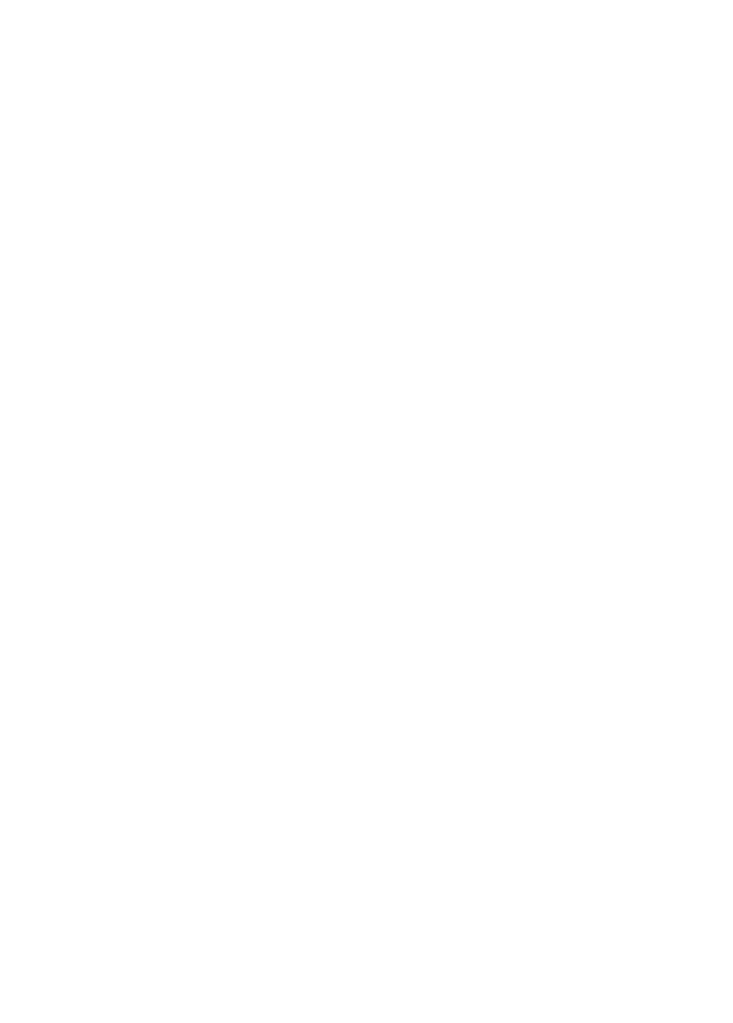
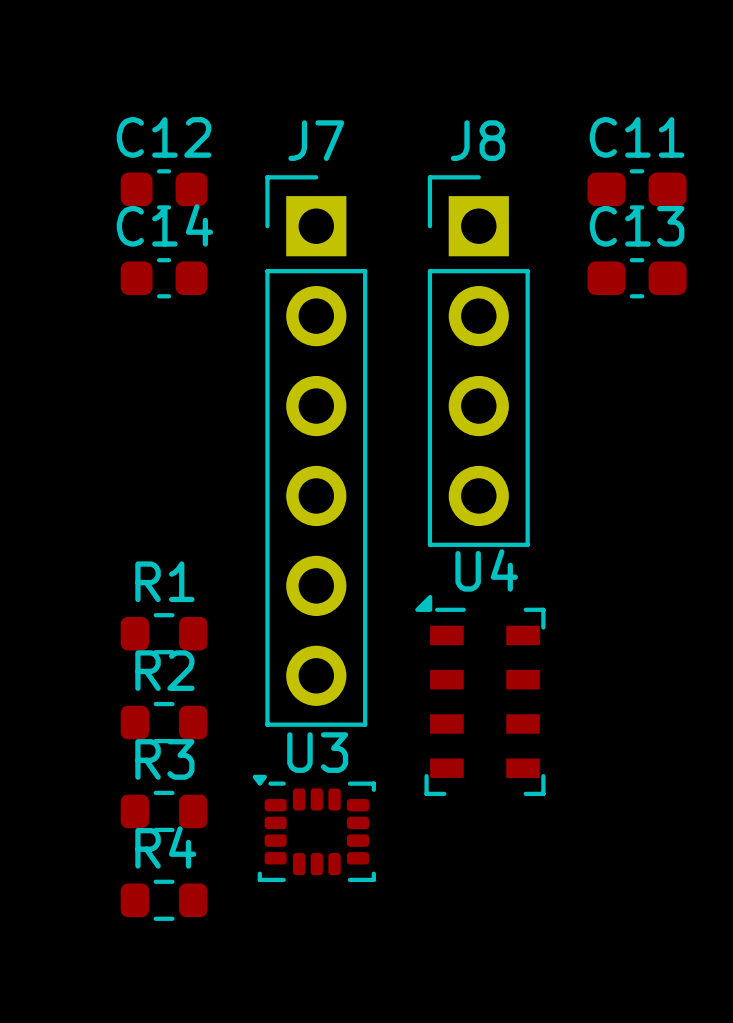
C12: none -> (164, 189)
C11: none -> (637, 189)
C14: none -> (164, 278)
C13: none -> (637, 278)
J8: none -> (478, 361)
J7: none -> (316, 451)
R1: none -> (164, 633)
U4: none -> (480, 695)
R2: none -> (164, 722)
R3: none -> (164, 811)
U3: none -> (314, 828)
R4: none -> (164, 900)

